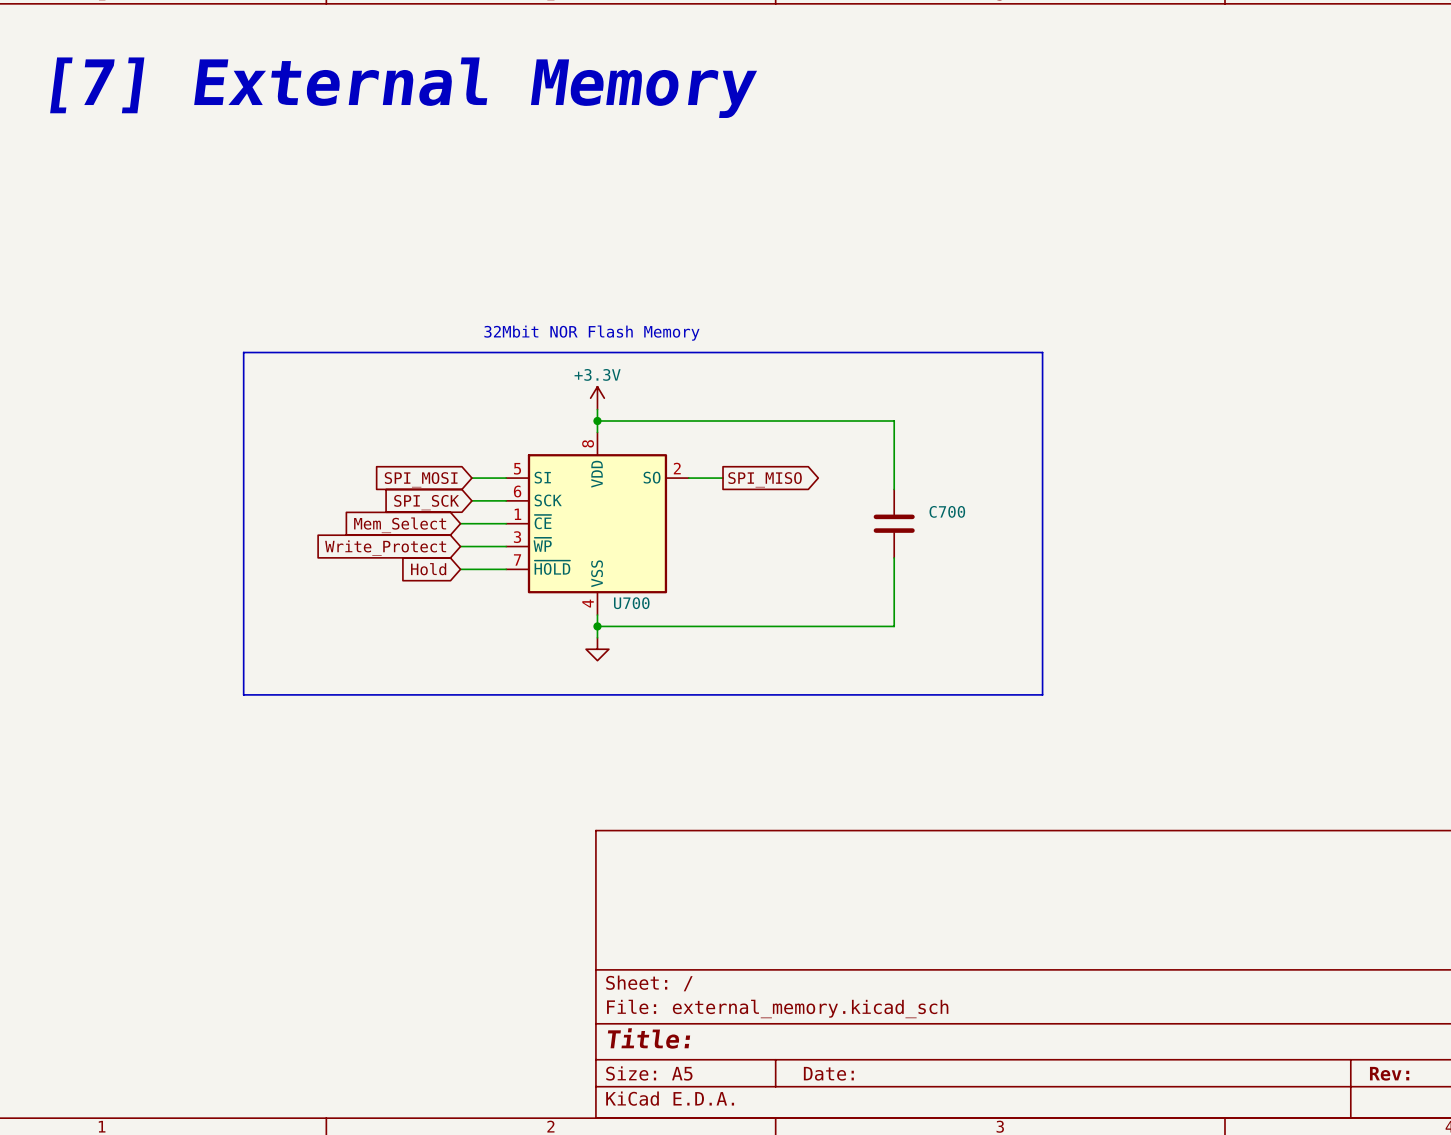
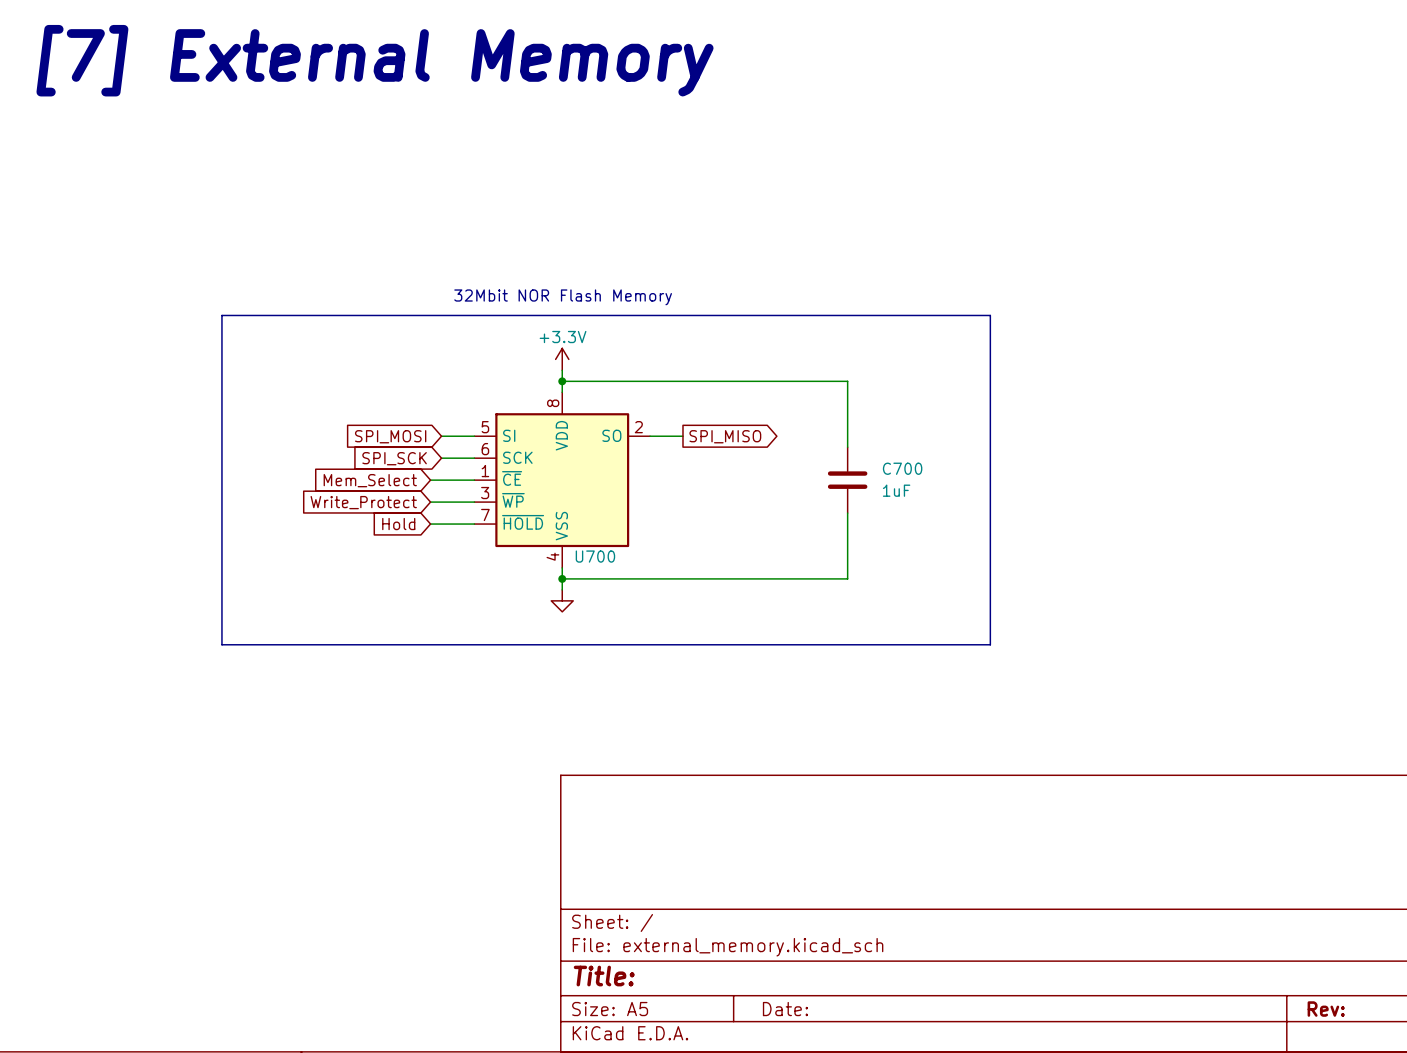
C700 value: none -> 1uF (896, 490)

